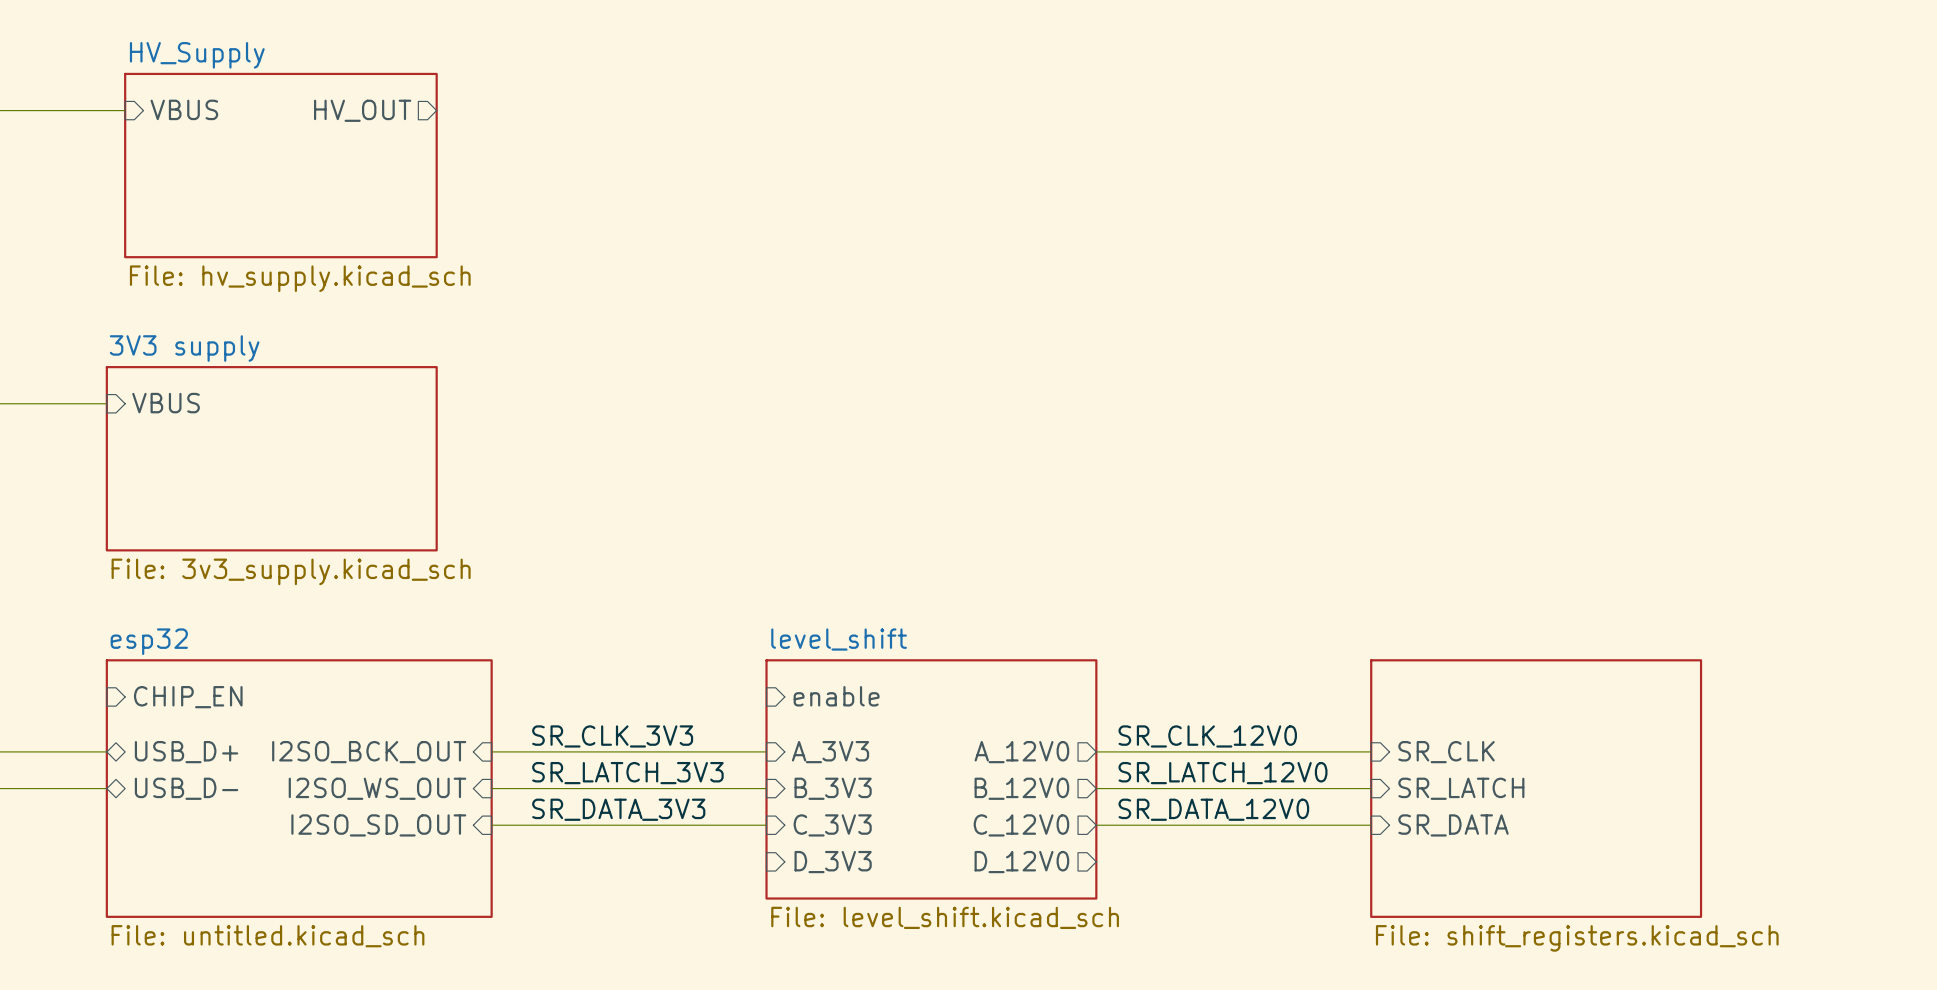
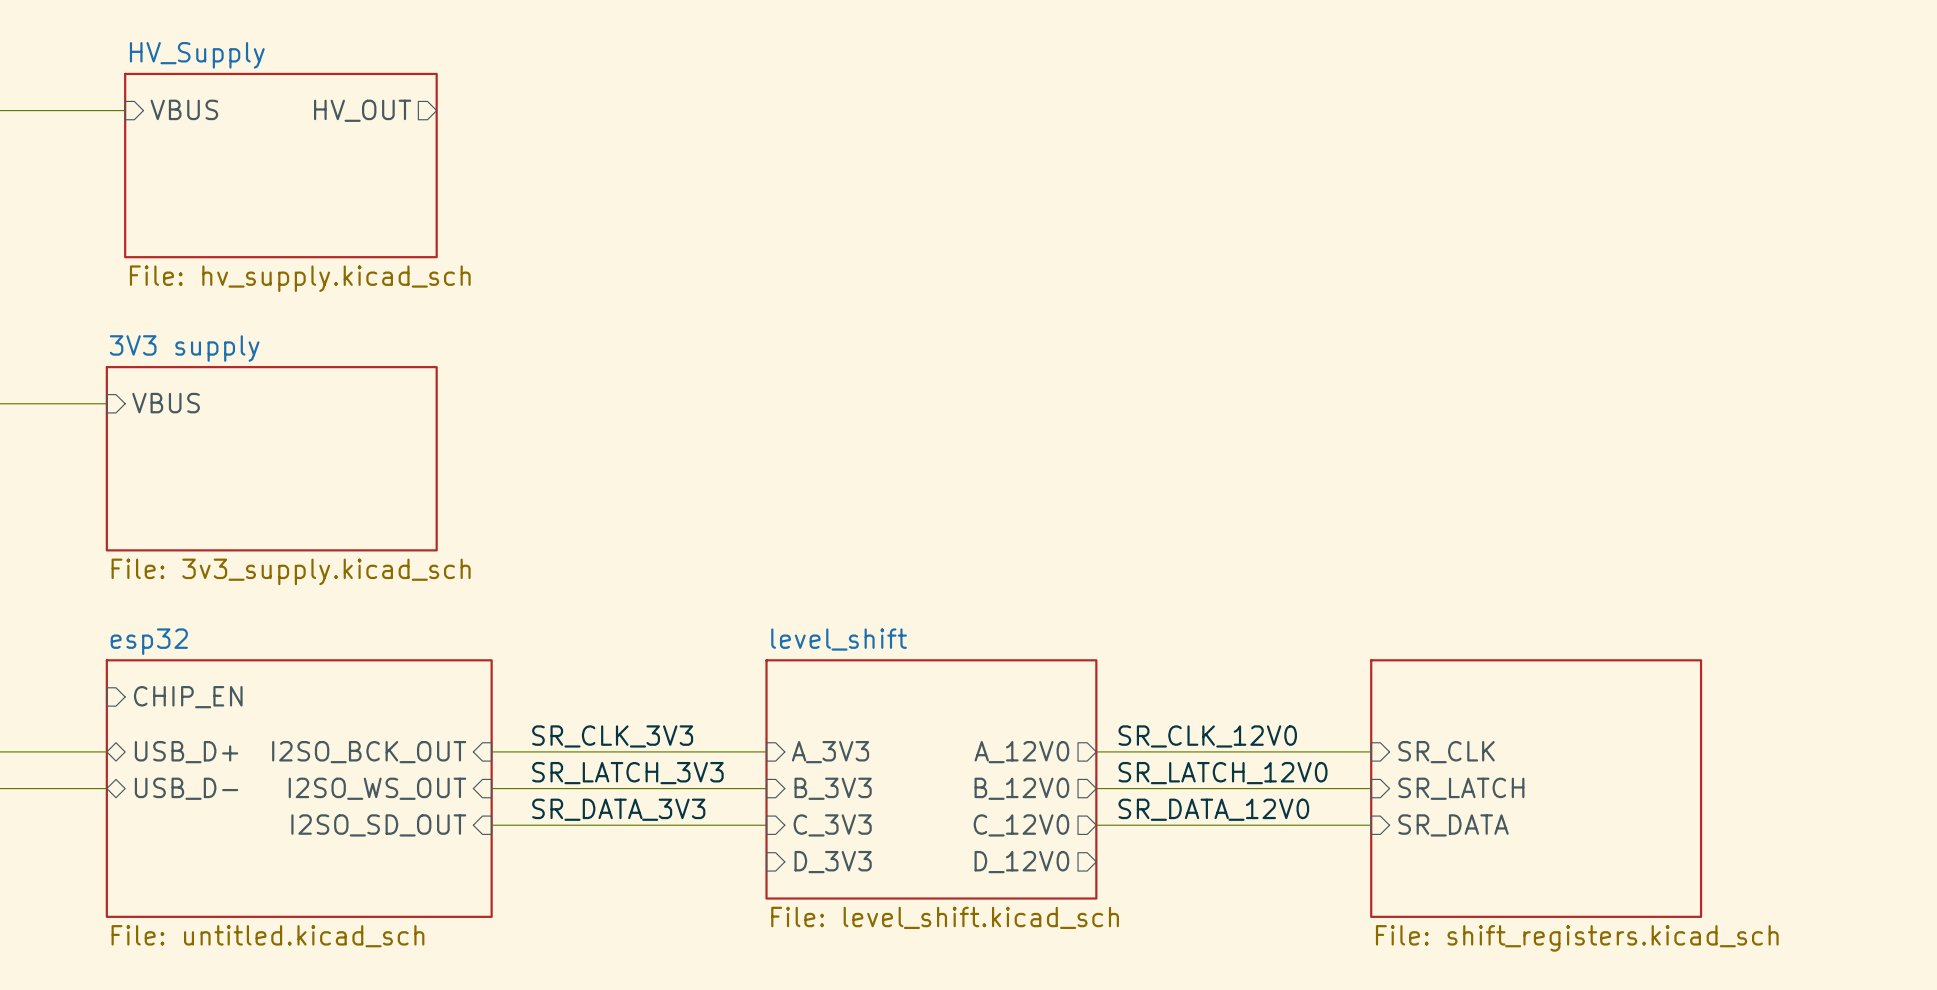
sheet pin: enable (836, 696) -> none

